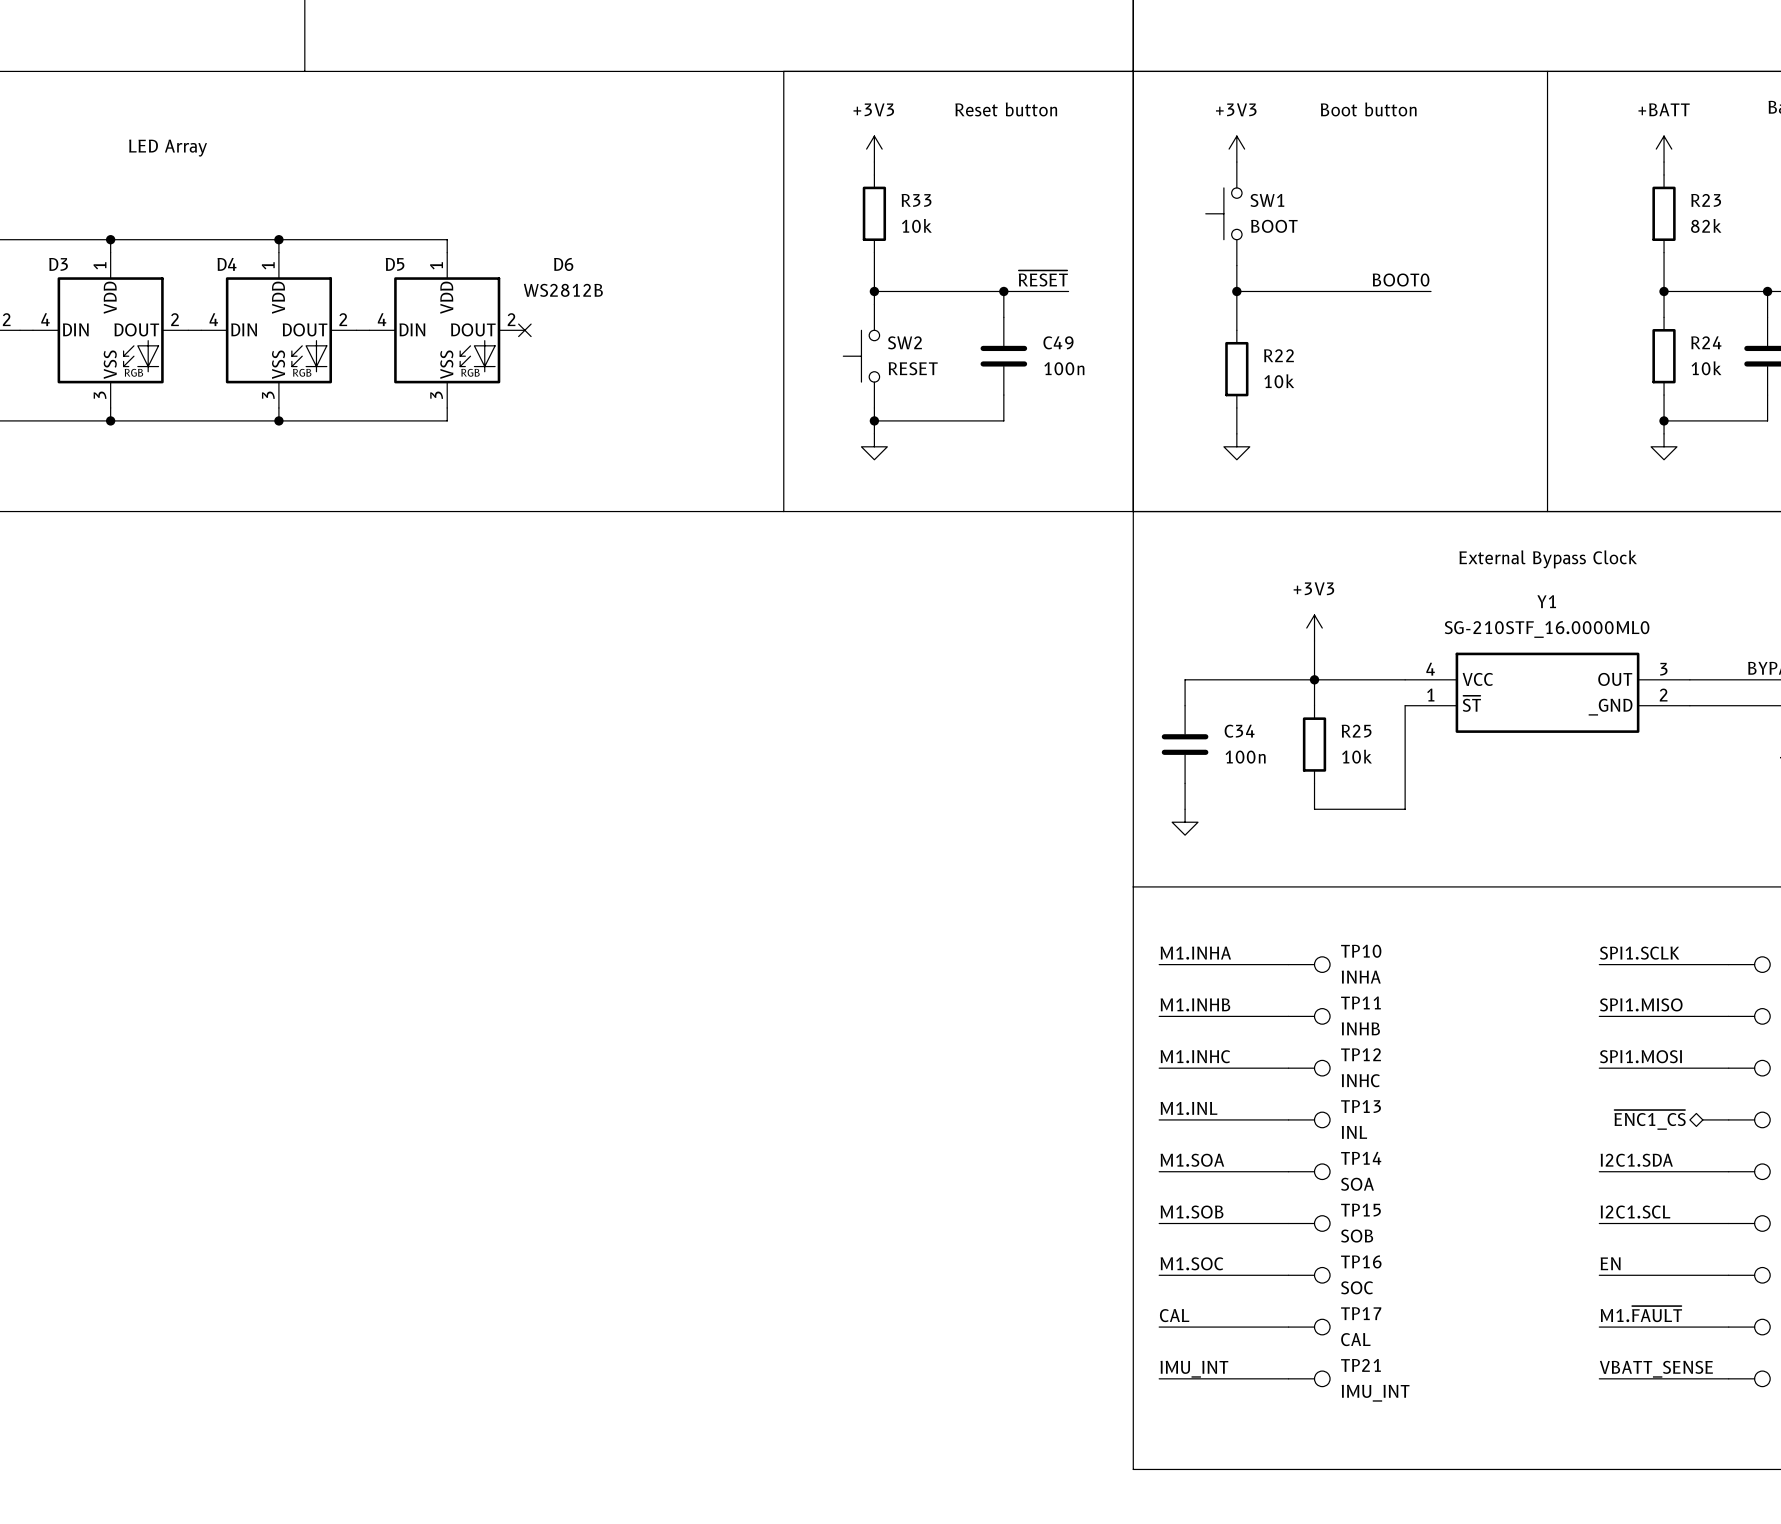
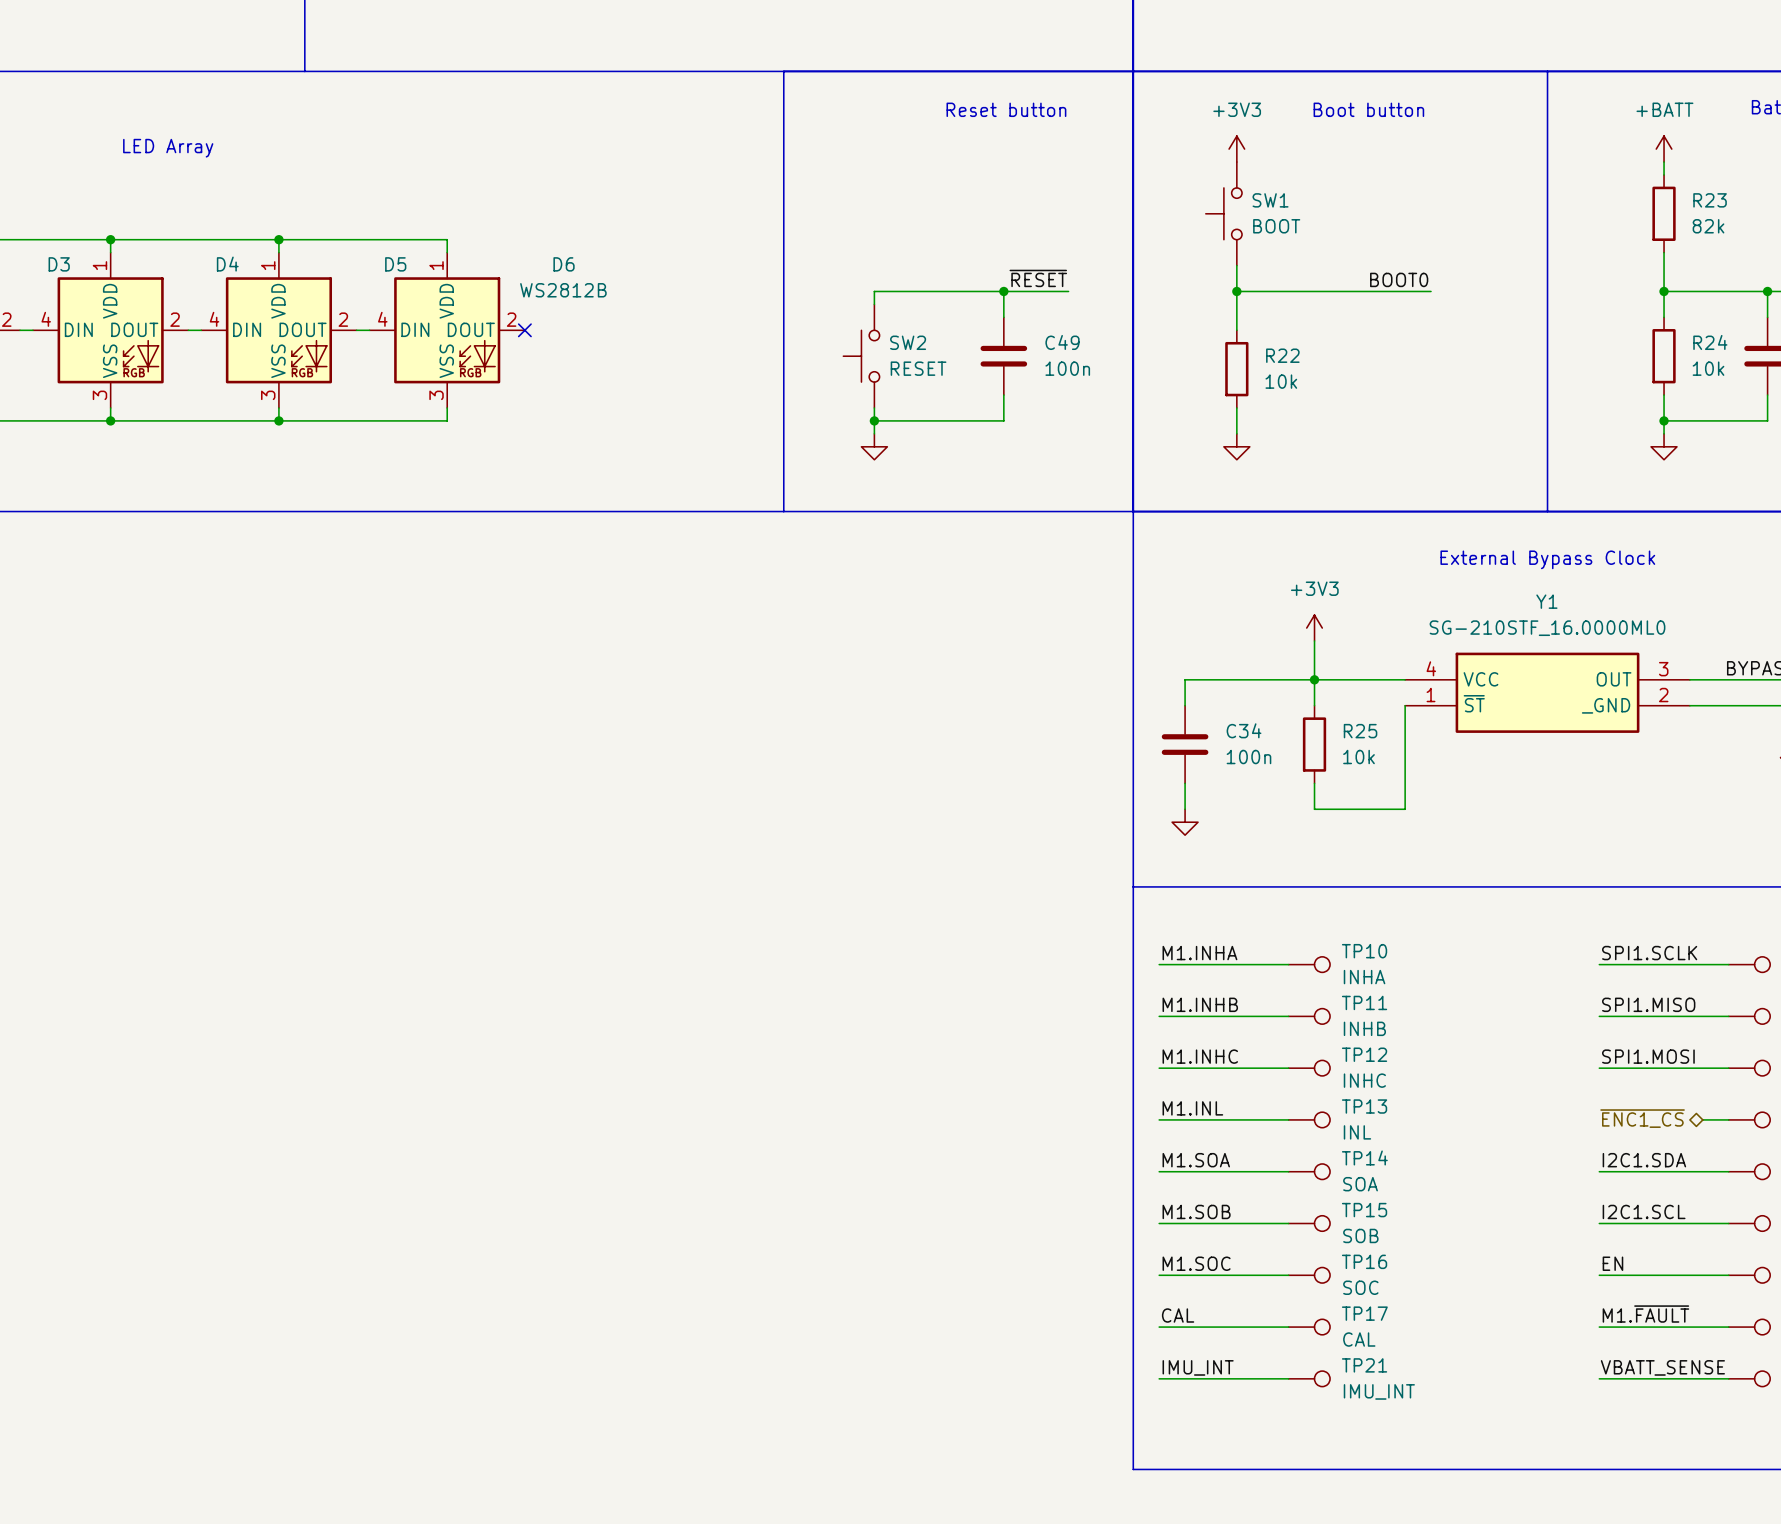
power symbol: +3V3 (874, 149) -> none
wire: (874, 162) (874, 174) -> none
R33: 10k (874, 213) -> none
wire: (874, 252) (874, 291) -> none
junction: (874, 291) -> none

